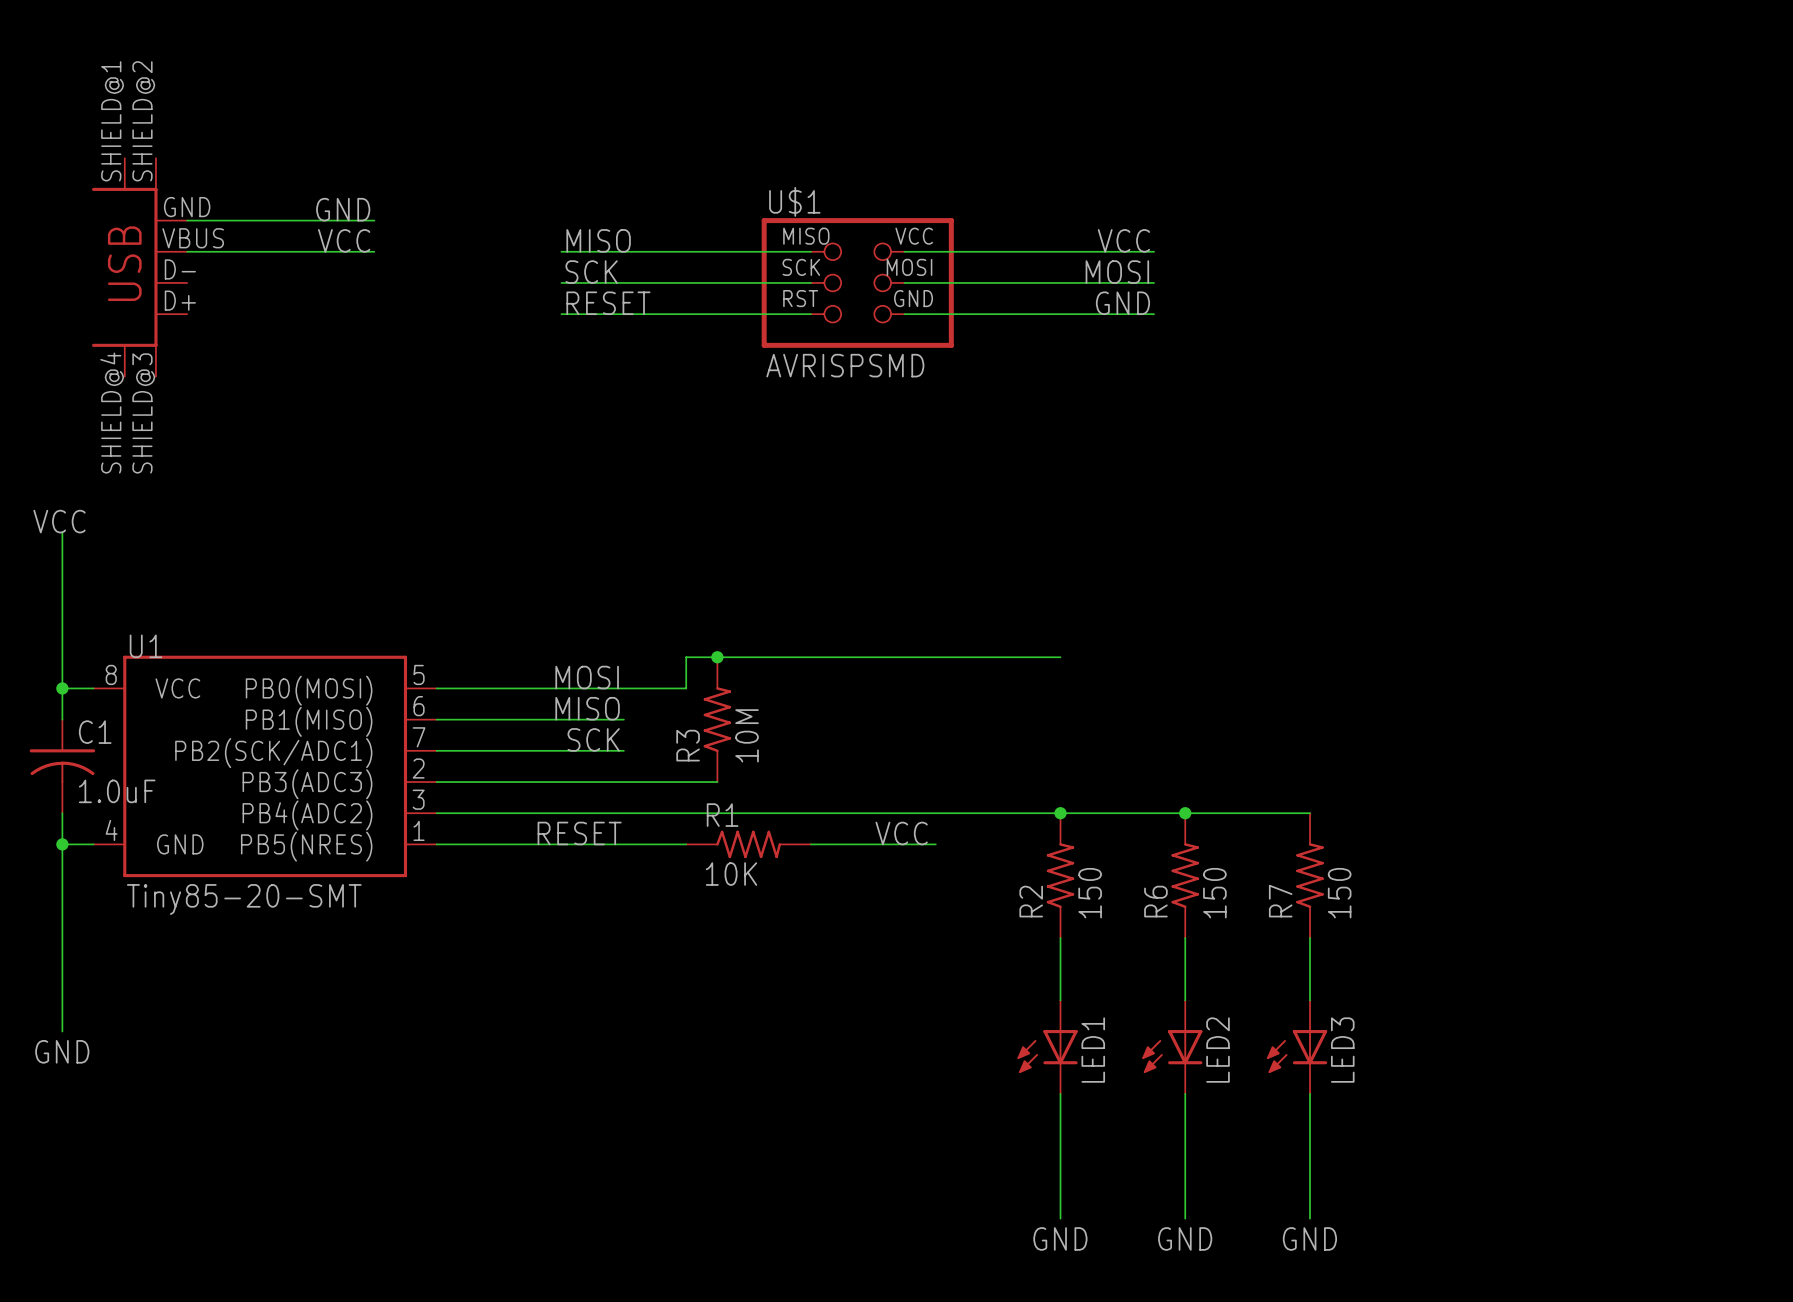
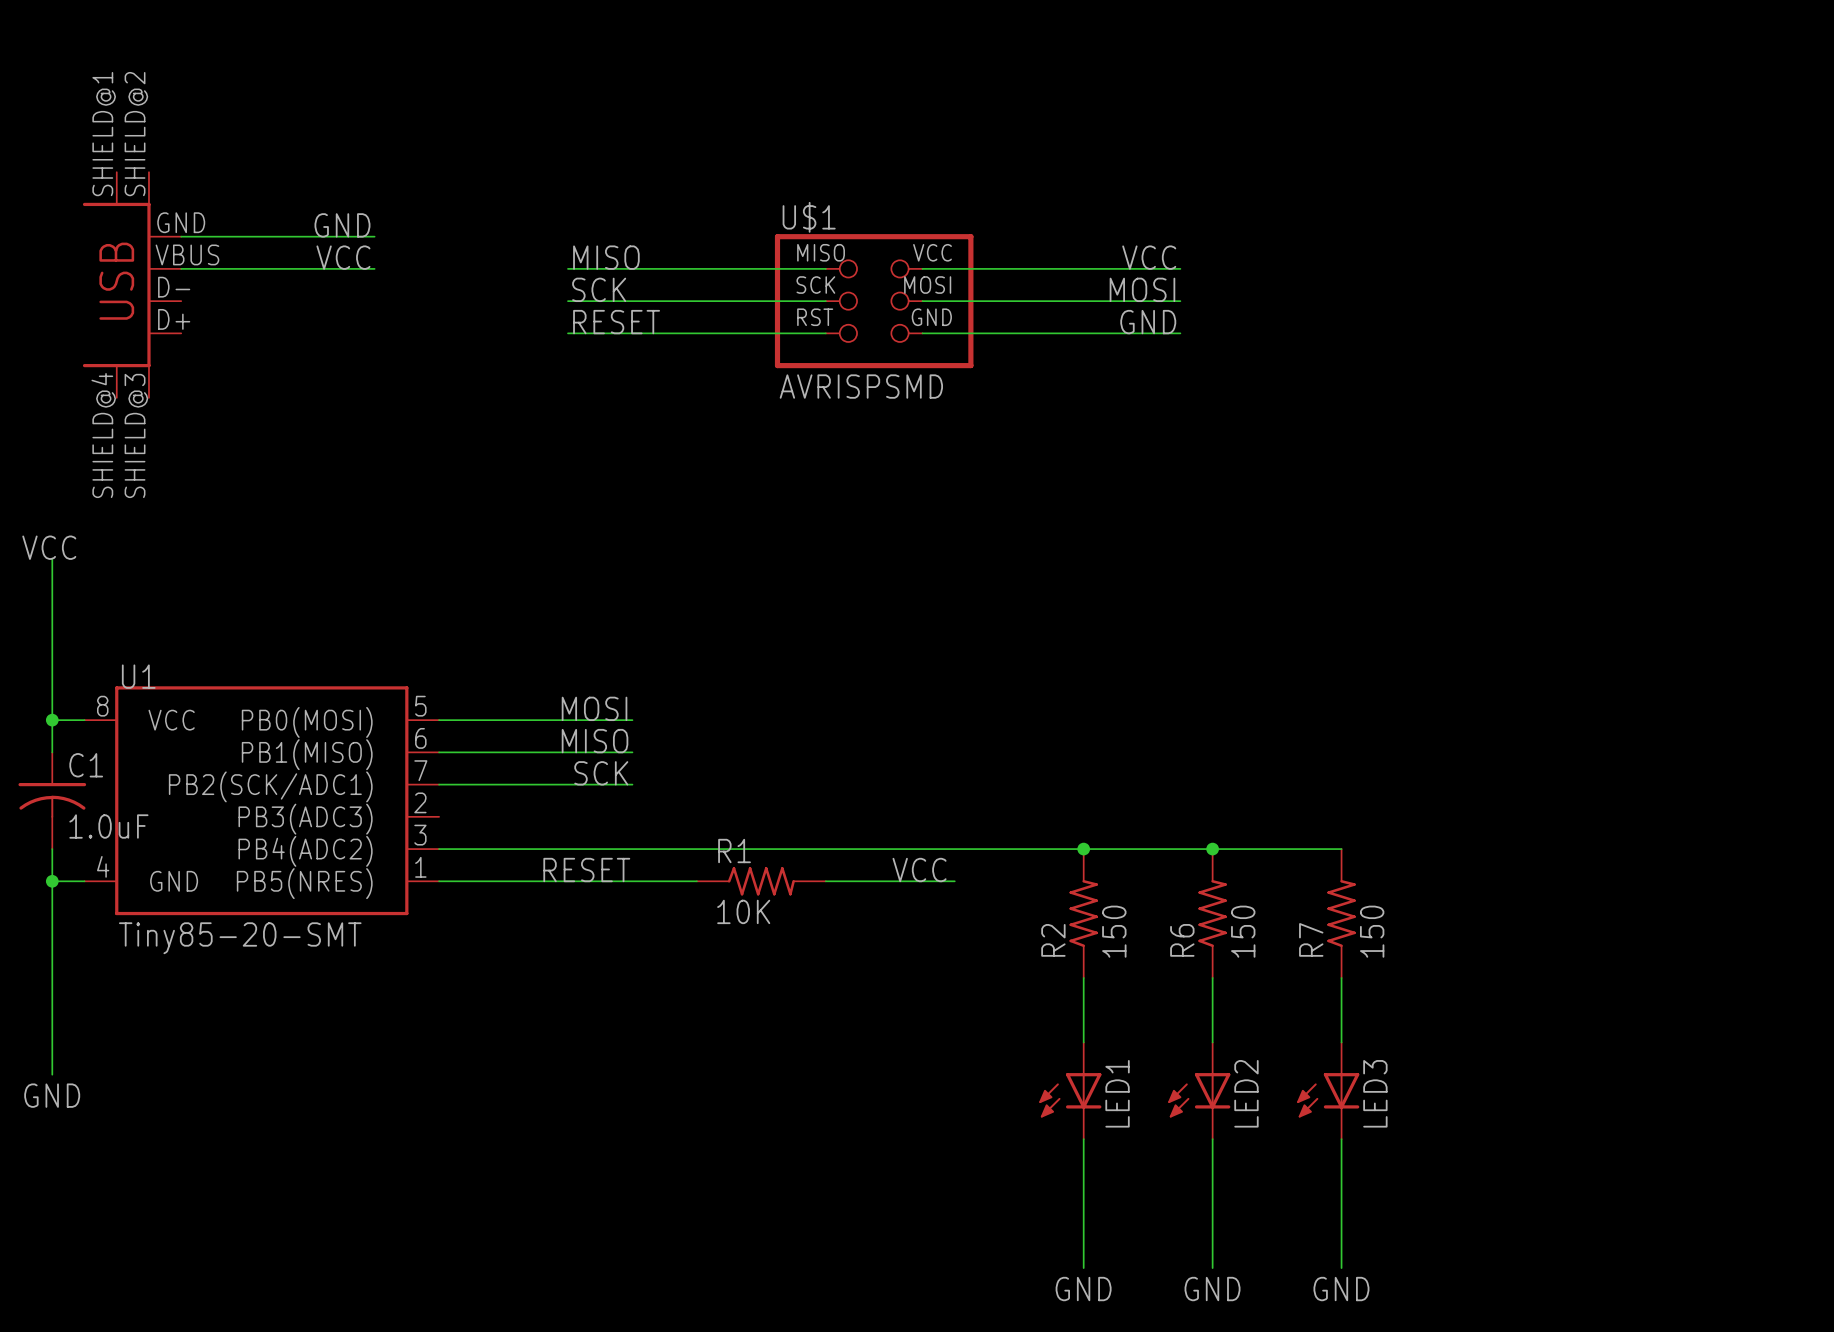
junction: (717, 657) -> none
wire: (1060, 657) (686, 657) (686, 688) (623, 688) -> none
R3: 10M (717, 719) -> none
wire: (436, 782) (717, 782) -> none

